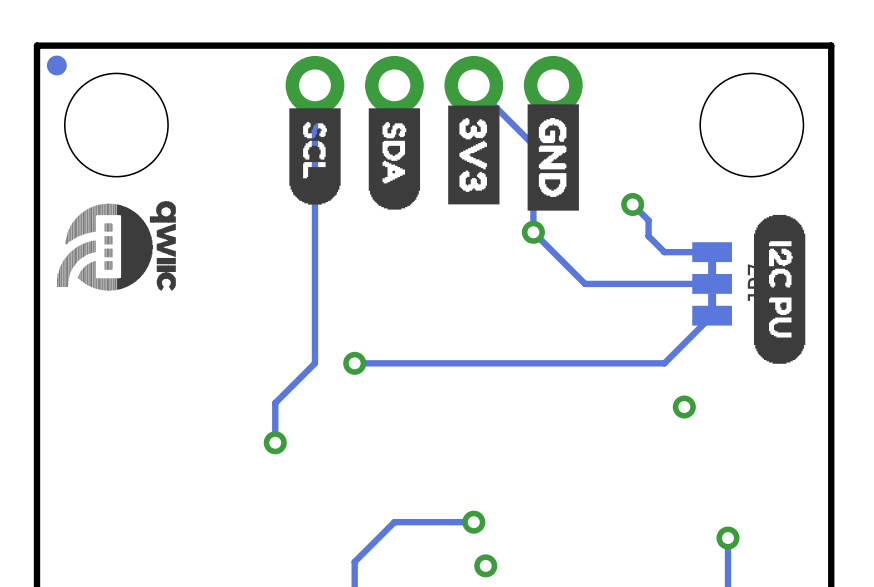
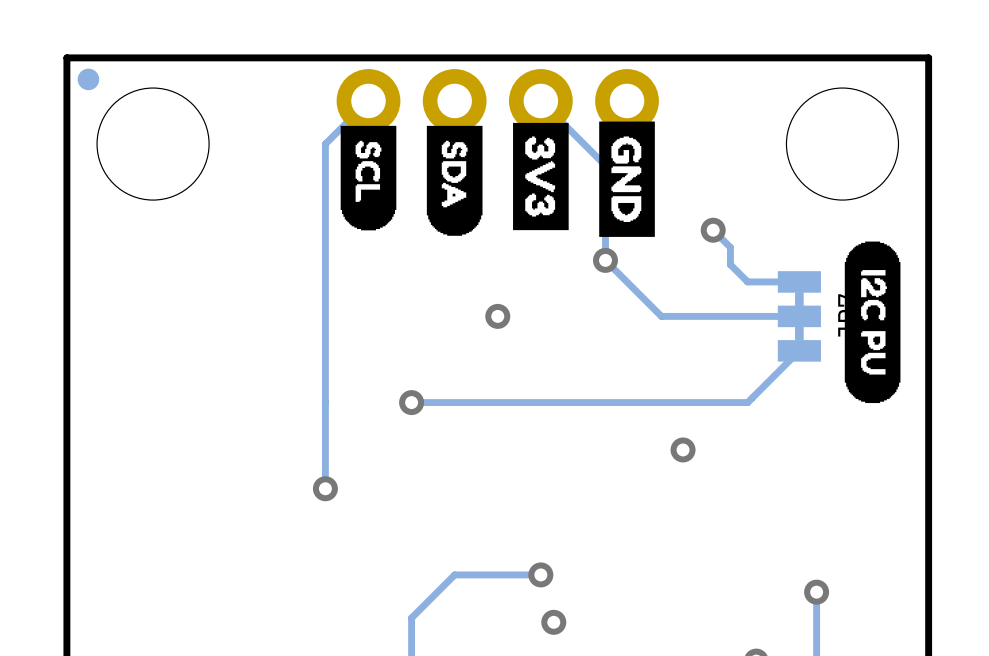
track: (314, 85) (314, 363) (275, 403) -> (368, 100) (325, 144) (325, 445)
drawing: [57, 201, 176, 291] -> none
via: none -> (497, 316)
via position: (684, 407) -> (683, 449)

